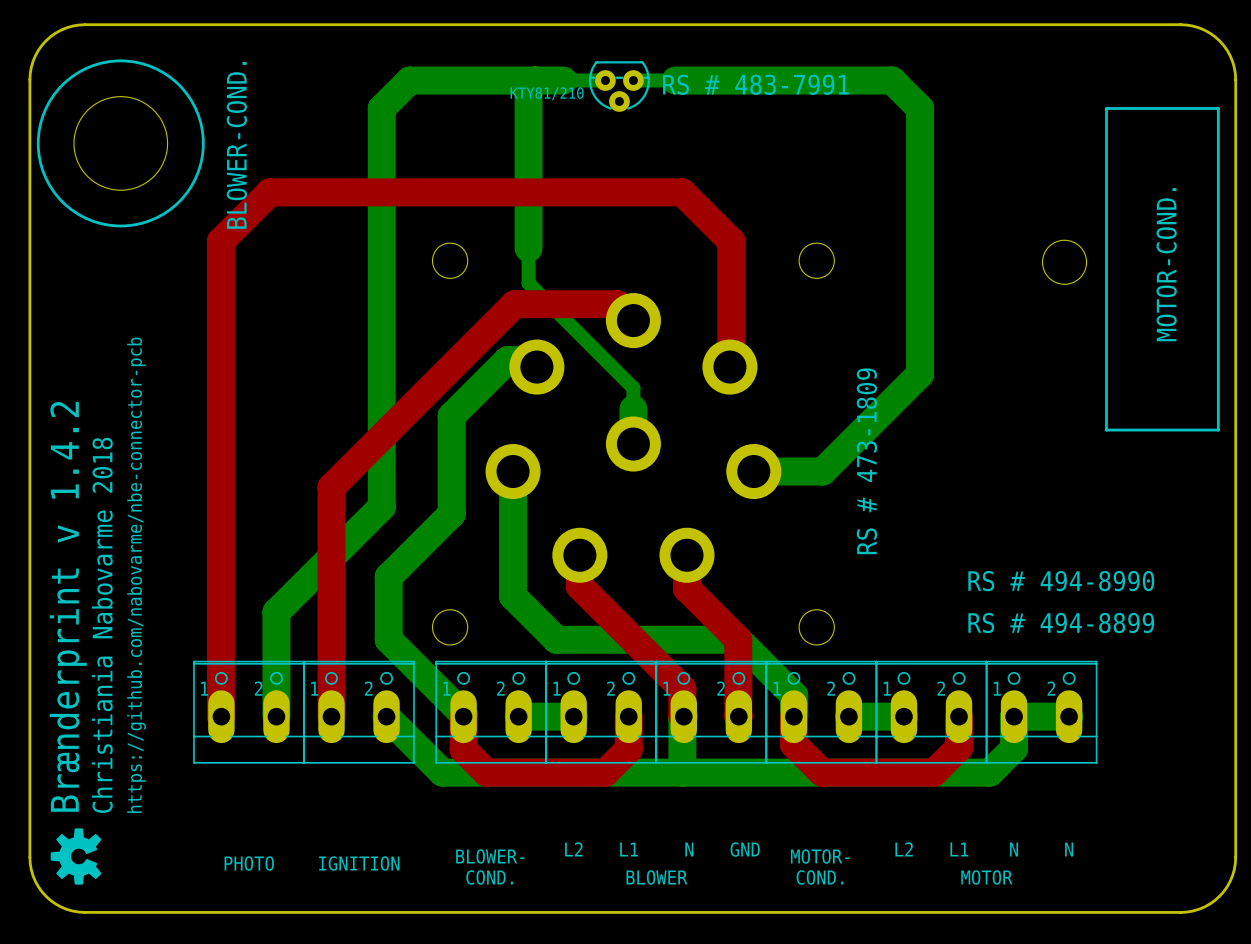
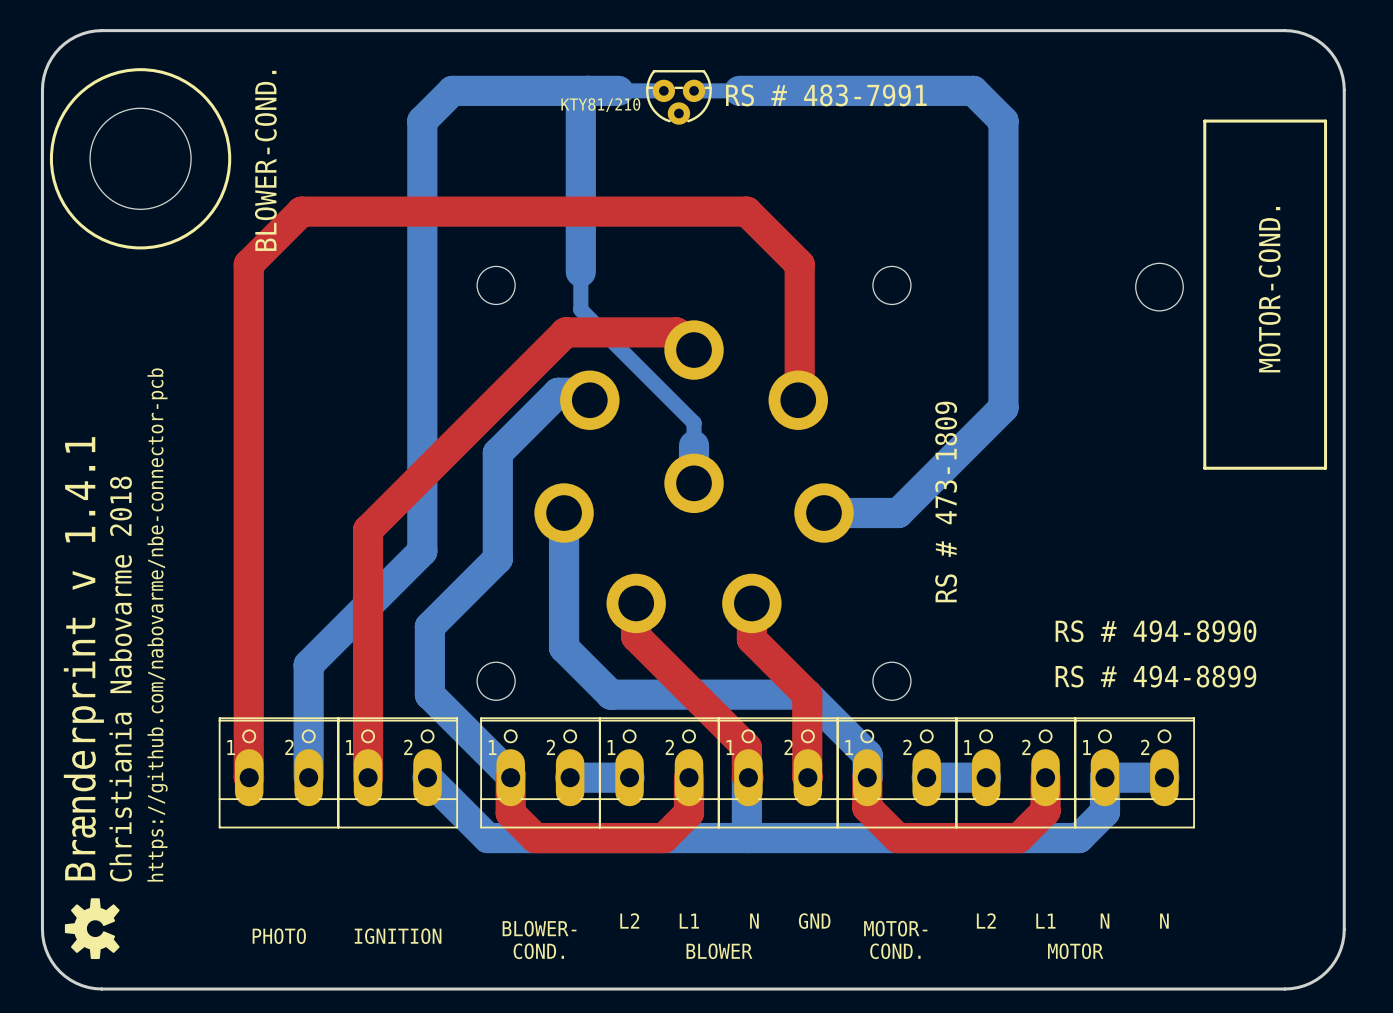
text: Brænderprint v 1.4.2 (68, 606) -> Brænderprint v 1.4.1 (83, 658)

